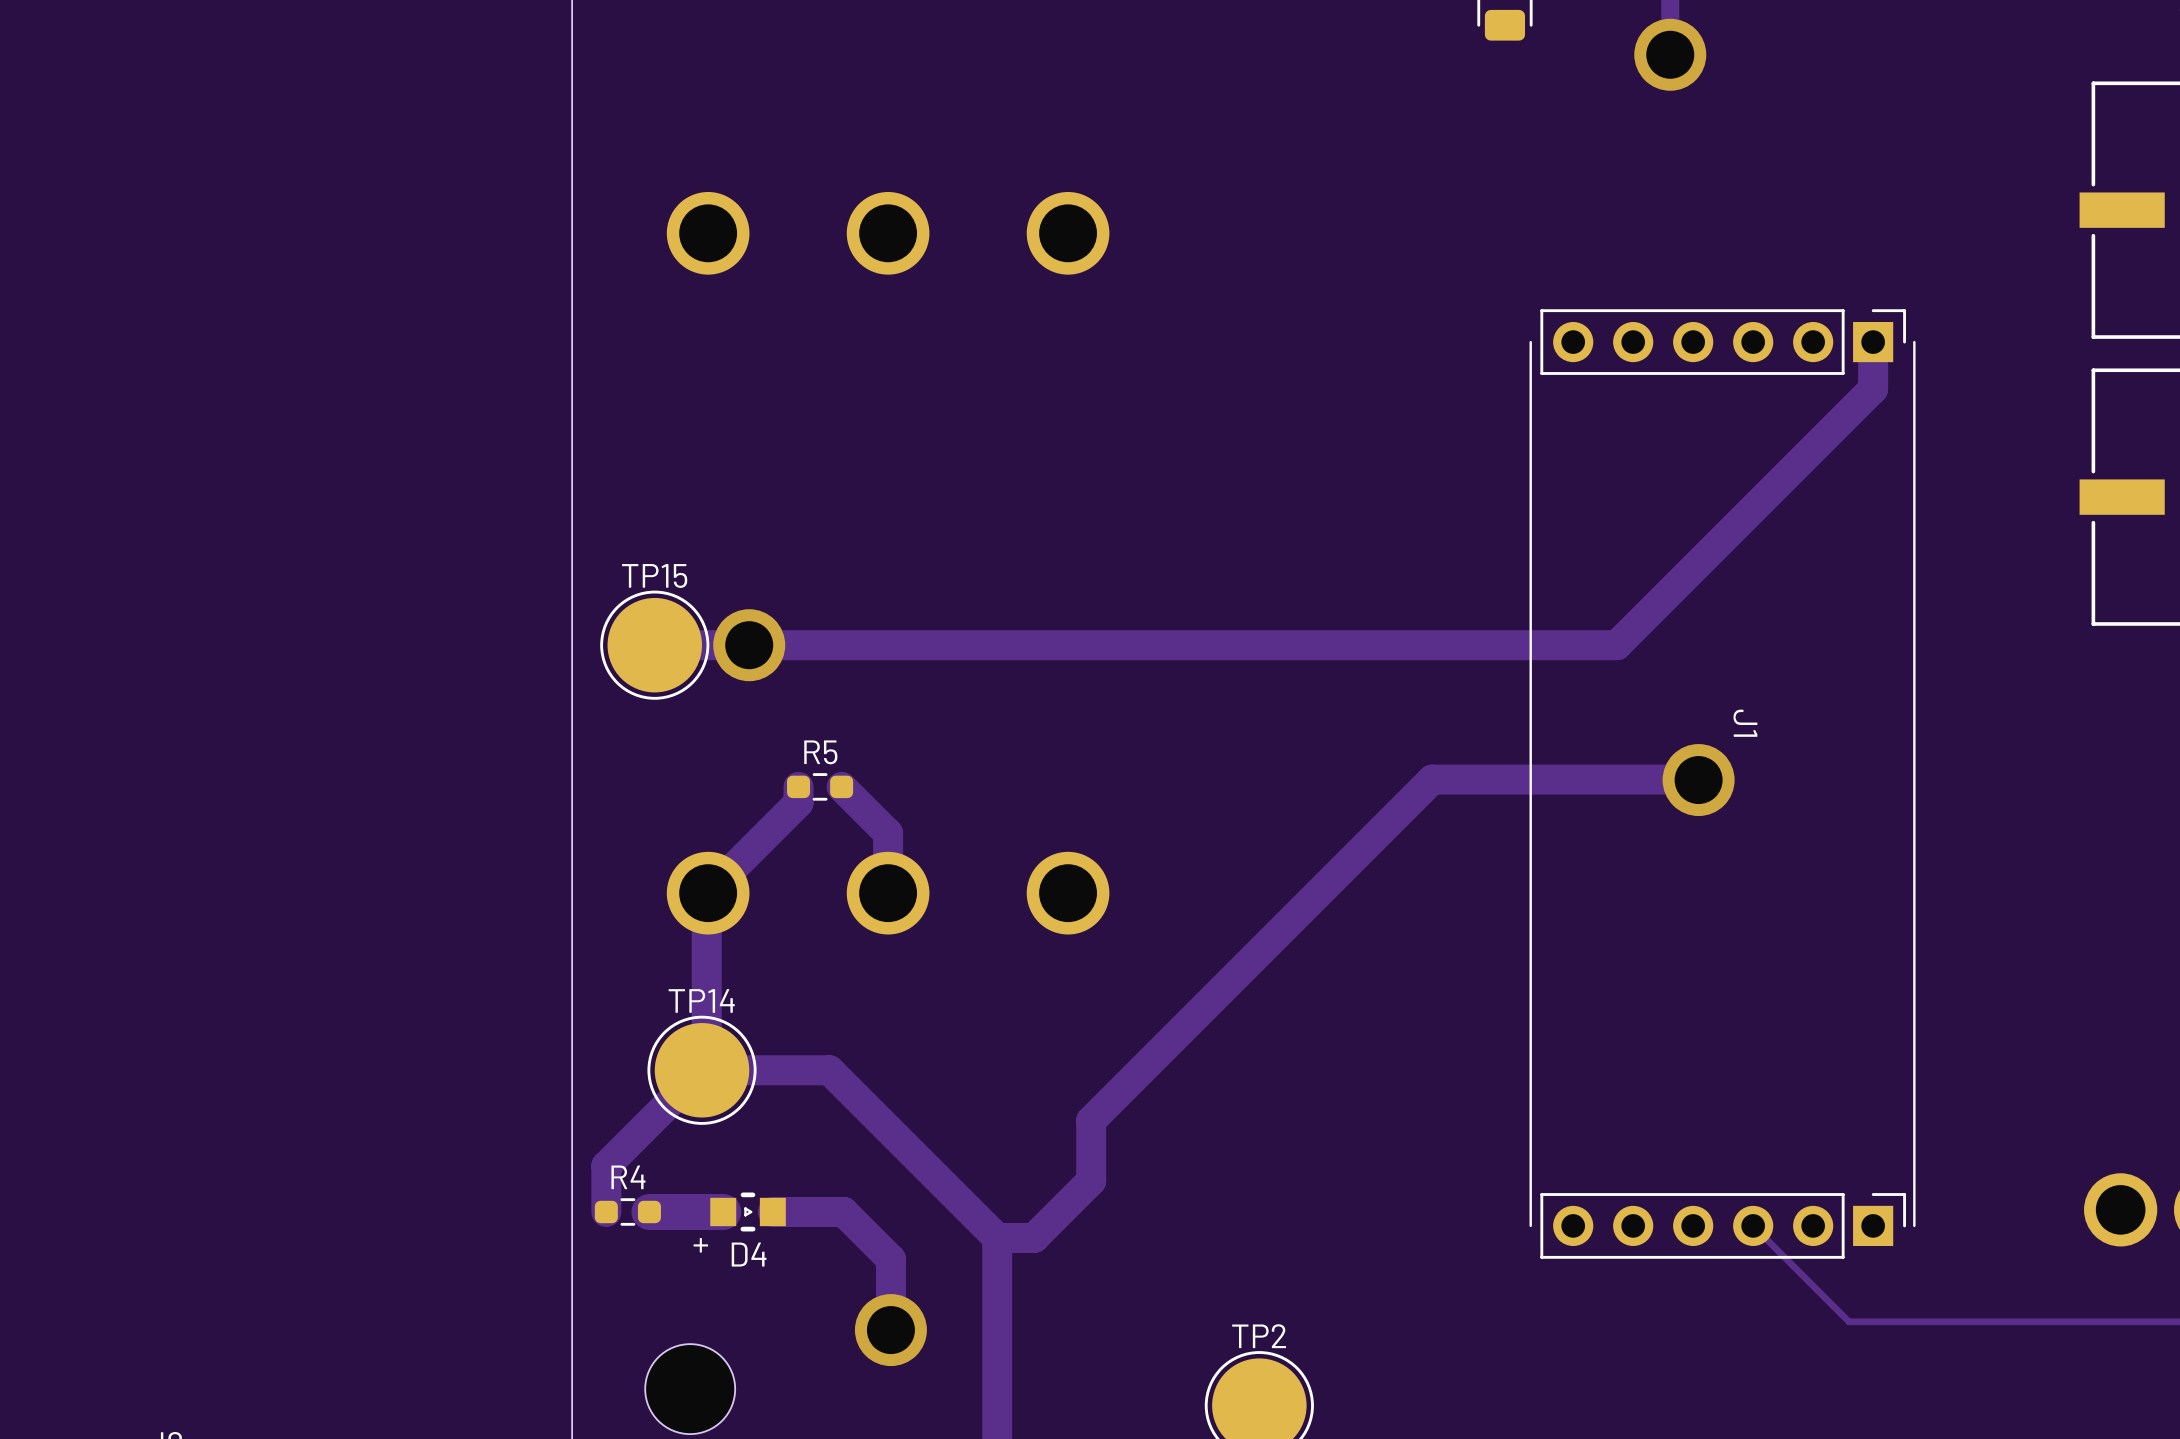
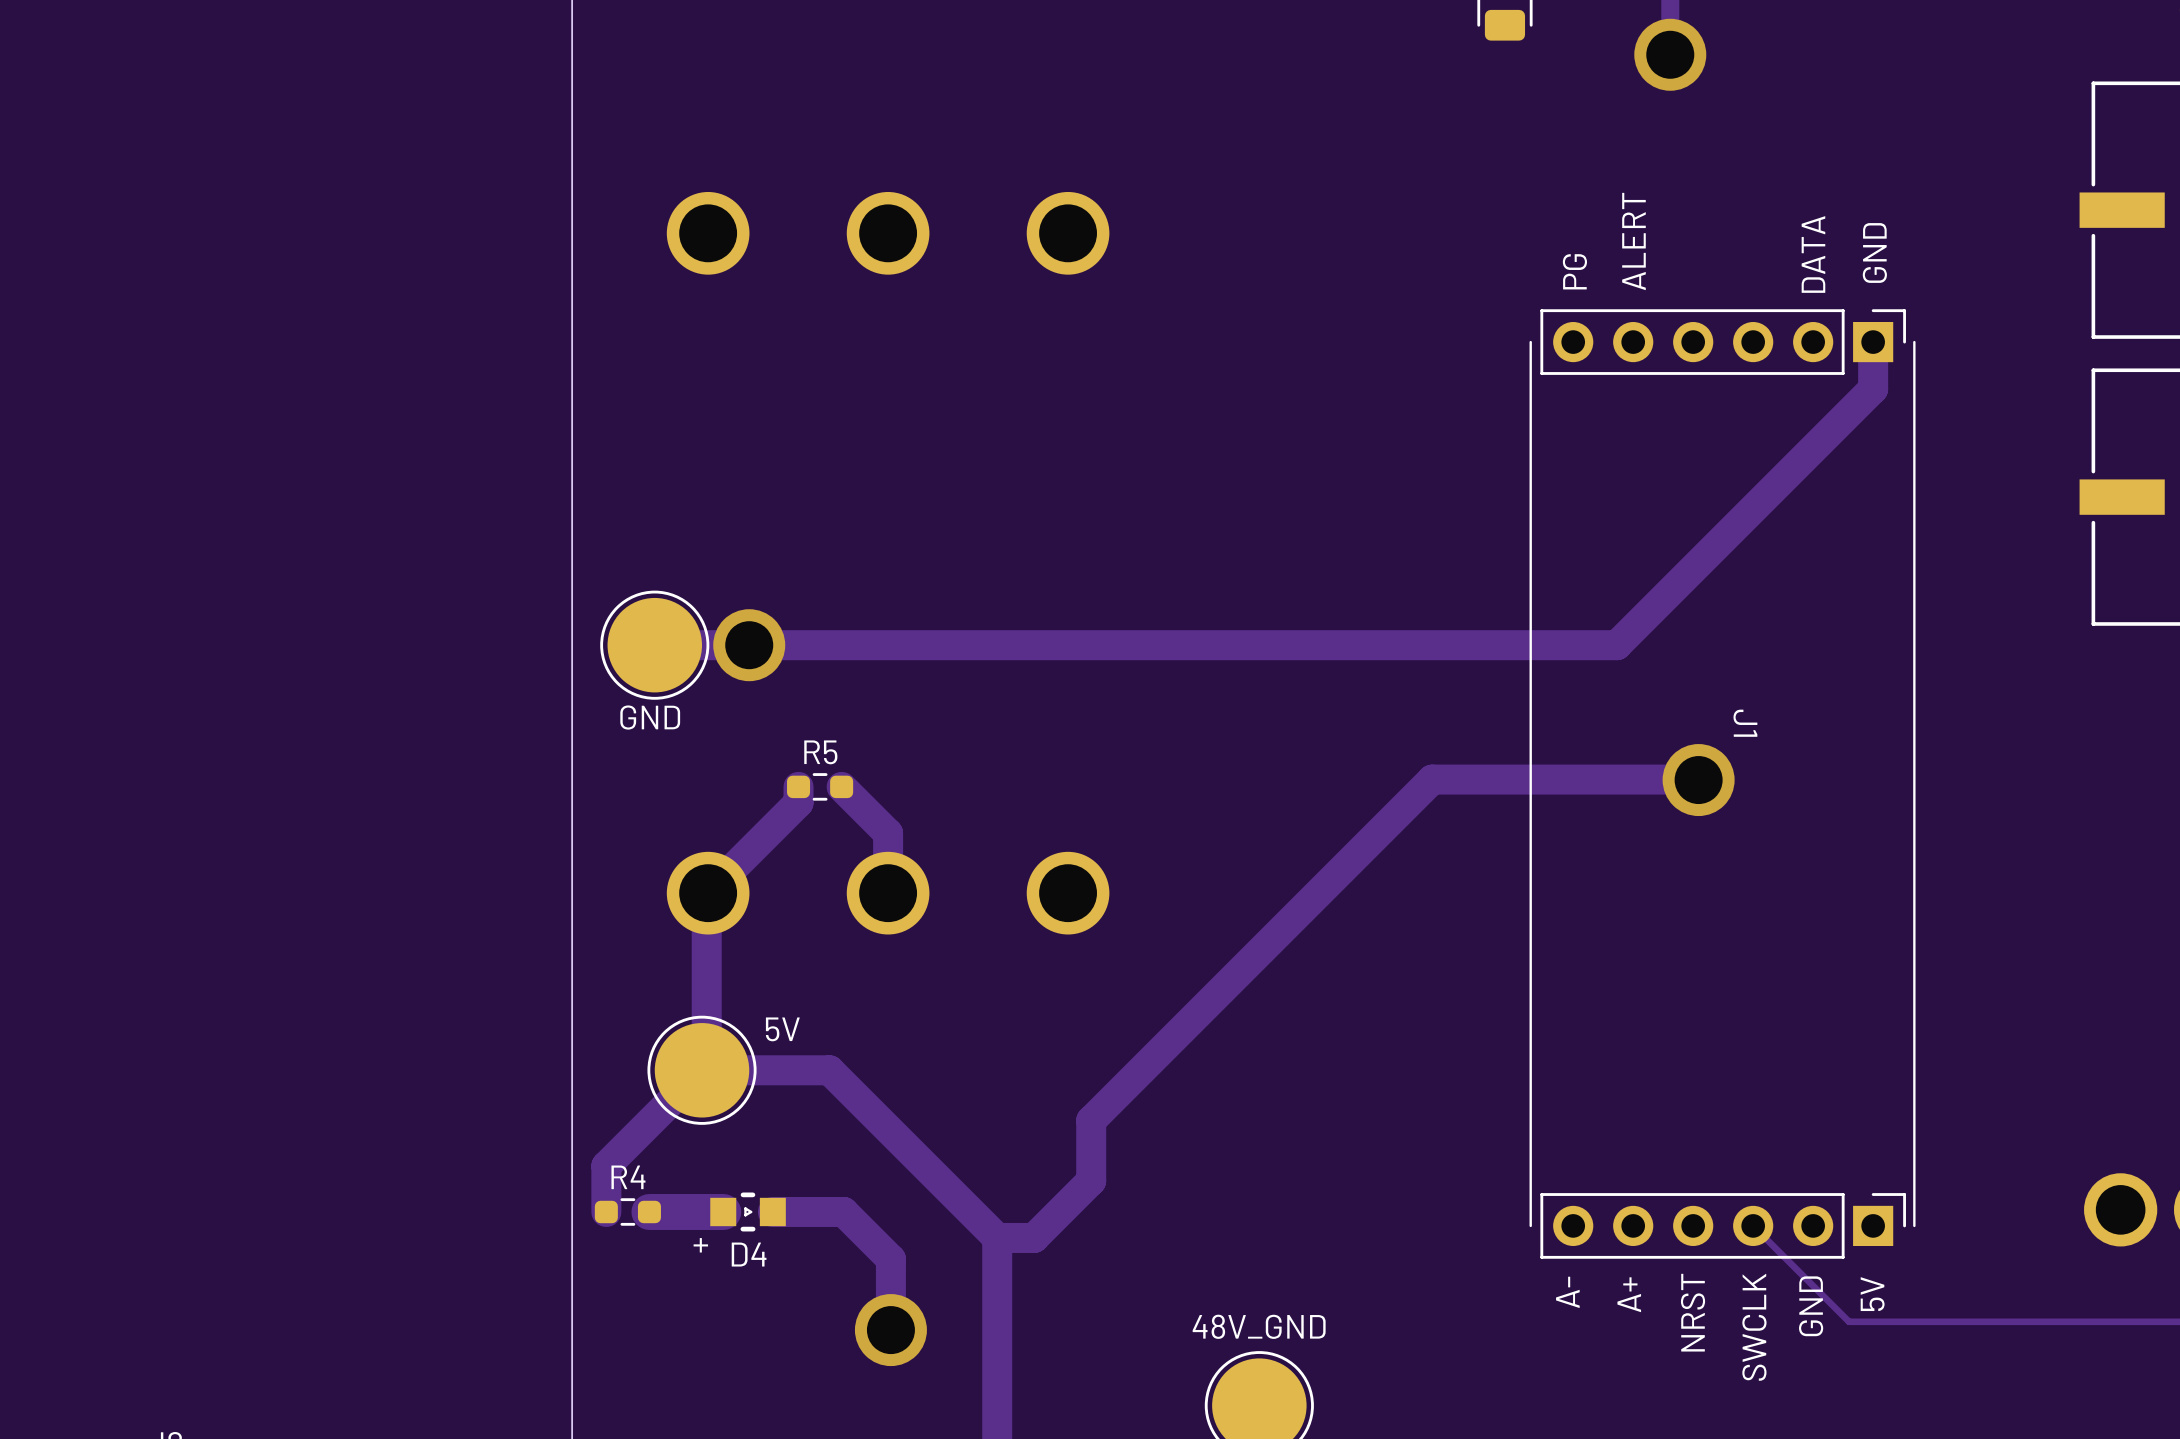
text: none -> ALERT (1633, 241)
text: none -> GND (1874, 252)
text: none -> DATA (1813, 254)
text: none -> PG (1574, 271)
TP15 name: TP15 (654, 575) -> none
text: none -> GND (650, 717)
TP14 name: TP14 (701, 1000) -> none
text: none -> 5V (782, 1029)
text: none -> A- (1567, 1292)
text: none -> A+ (1629, 1294)
text: none -> 5V (1872, 1294)
text: none -> GND (1811, 1306)
text: none -> NRST (1693, 1312)
text: none -> 48V_GND (1259, 1326)
text: none -> SWCLK (1754, 1327)
TP2 name: TP2 (1259, 1336) -> none
part: (690, 1389) -> none

